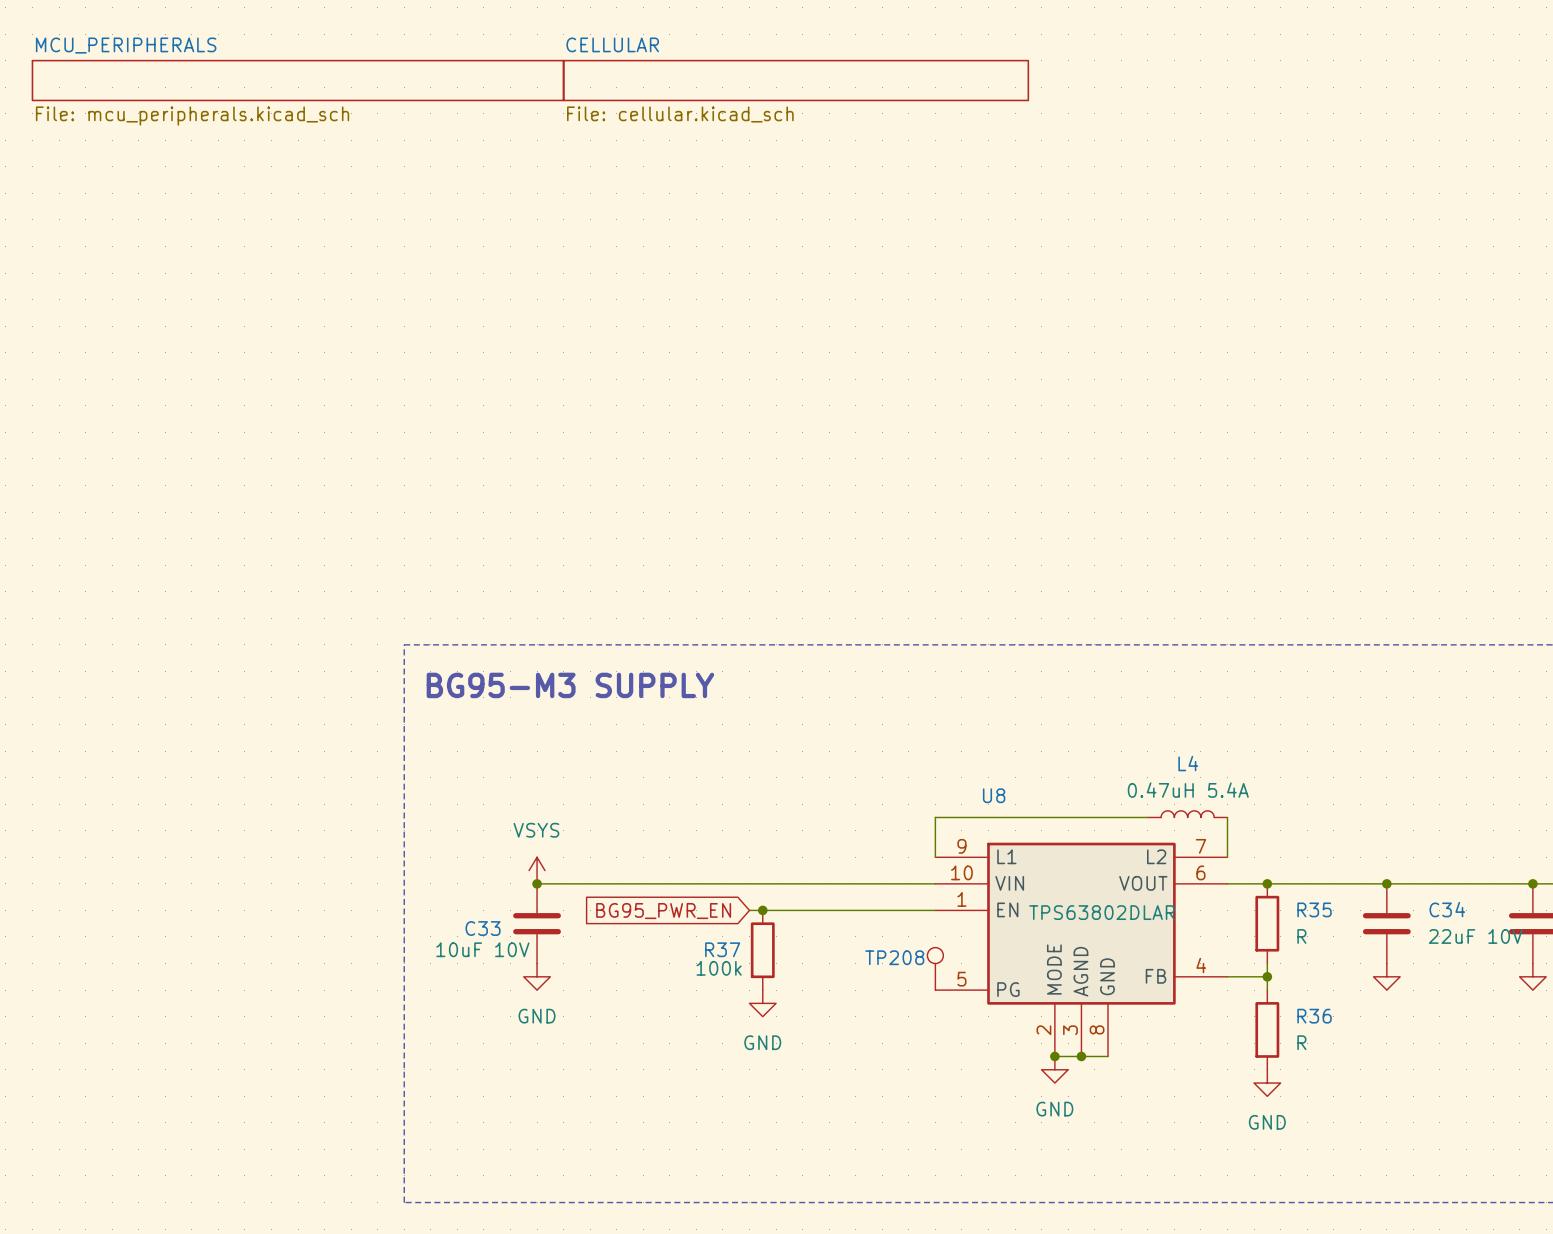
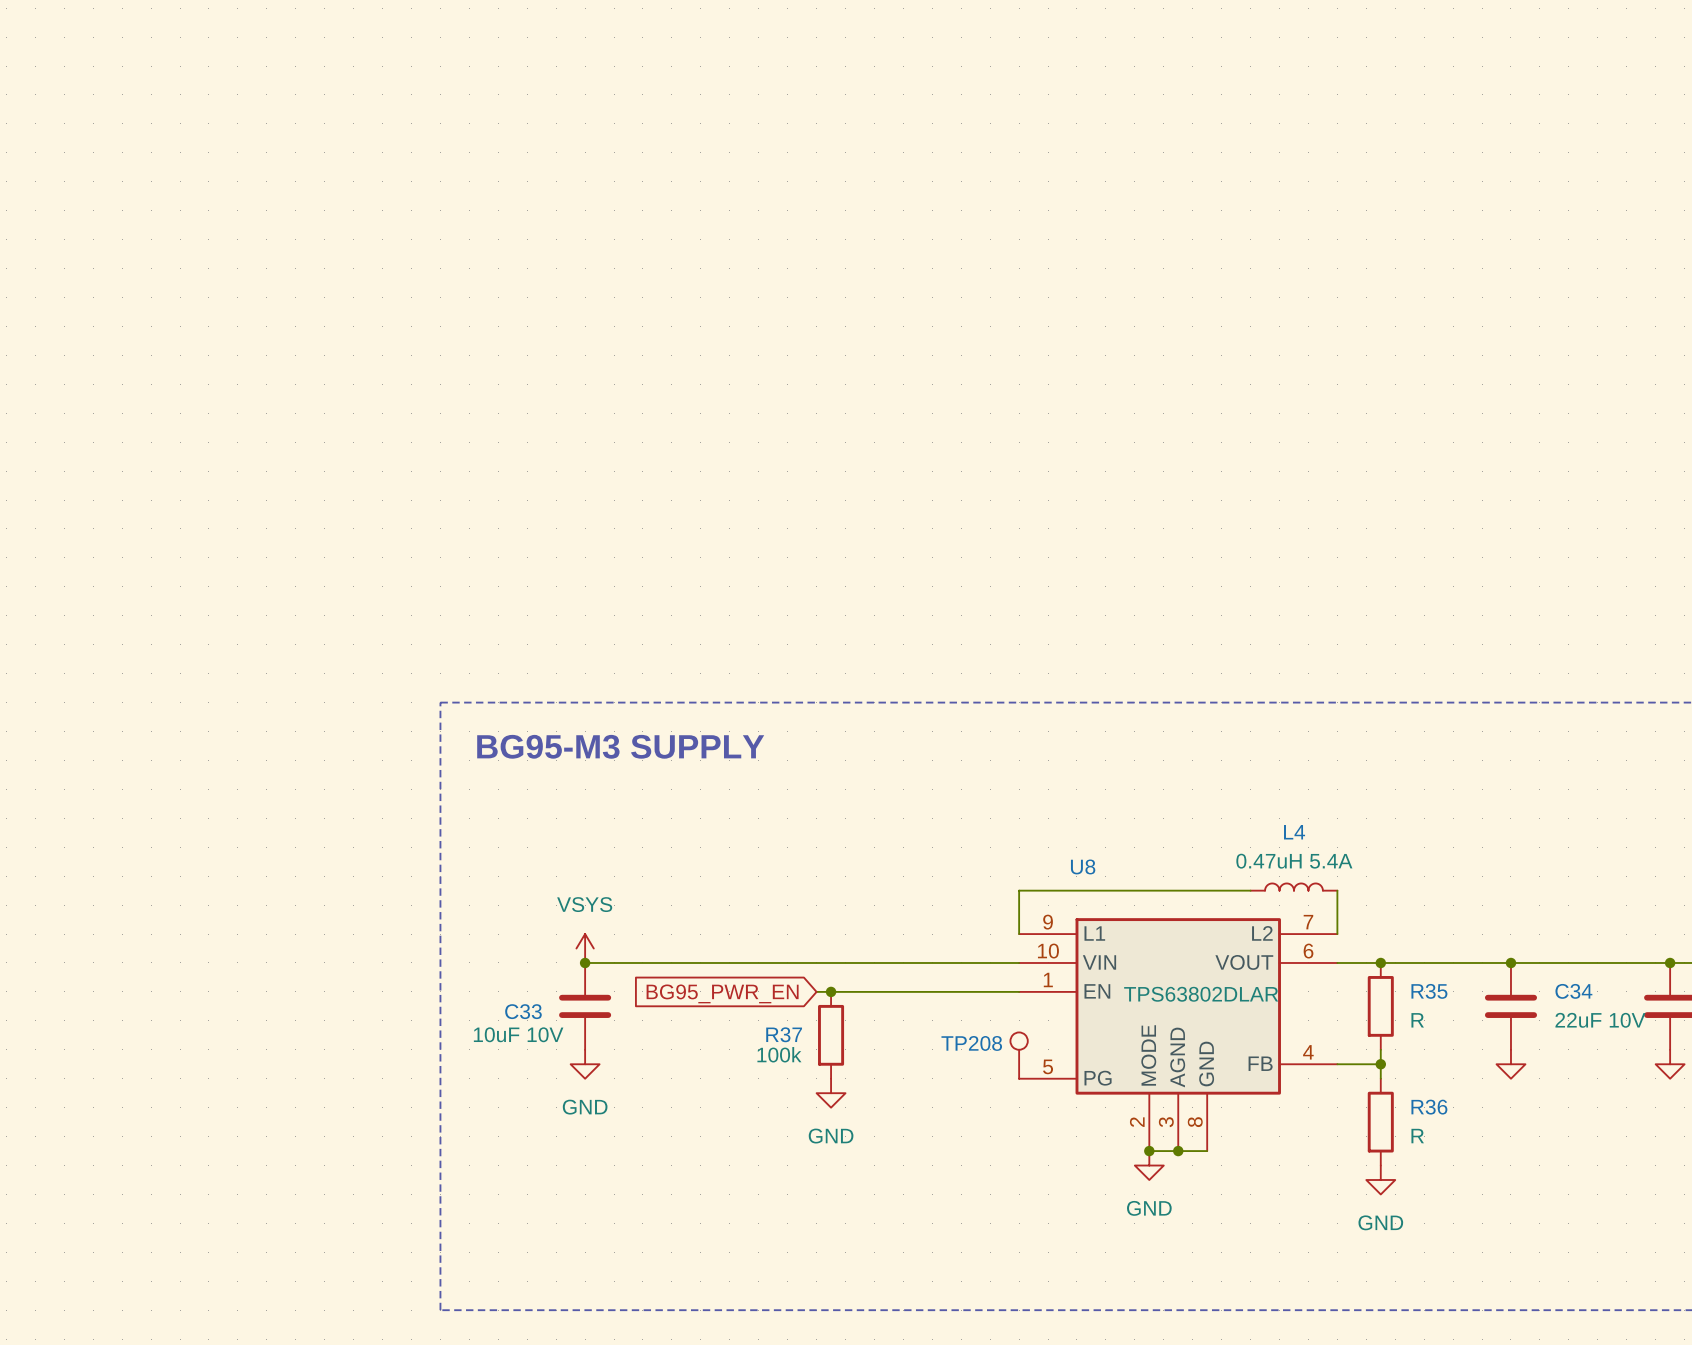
sheet MCU_PERIPHERALS: File: mcu_peripherals.kicad_sch (298, 80) -> none
sheet CELLULAR: File: cellular.kicad_sch (795, 80) -> none

